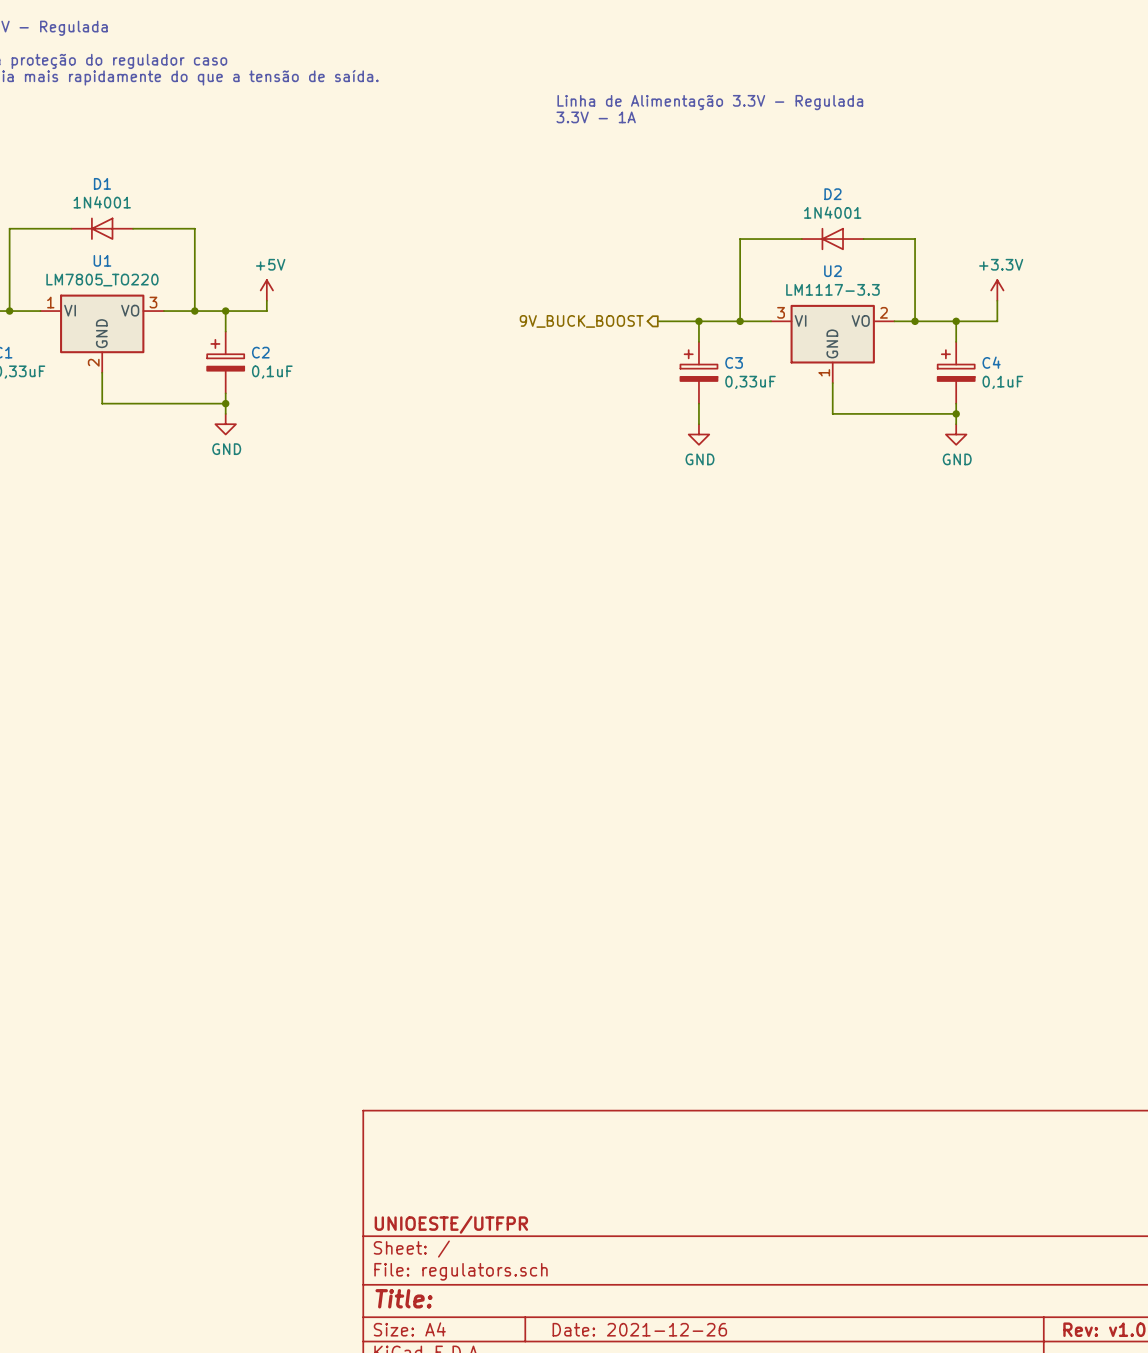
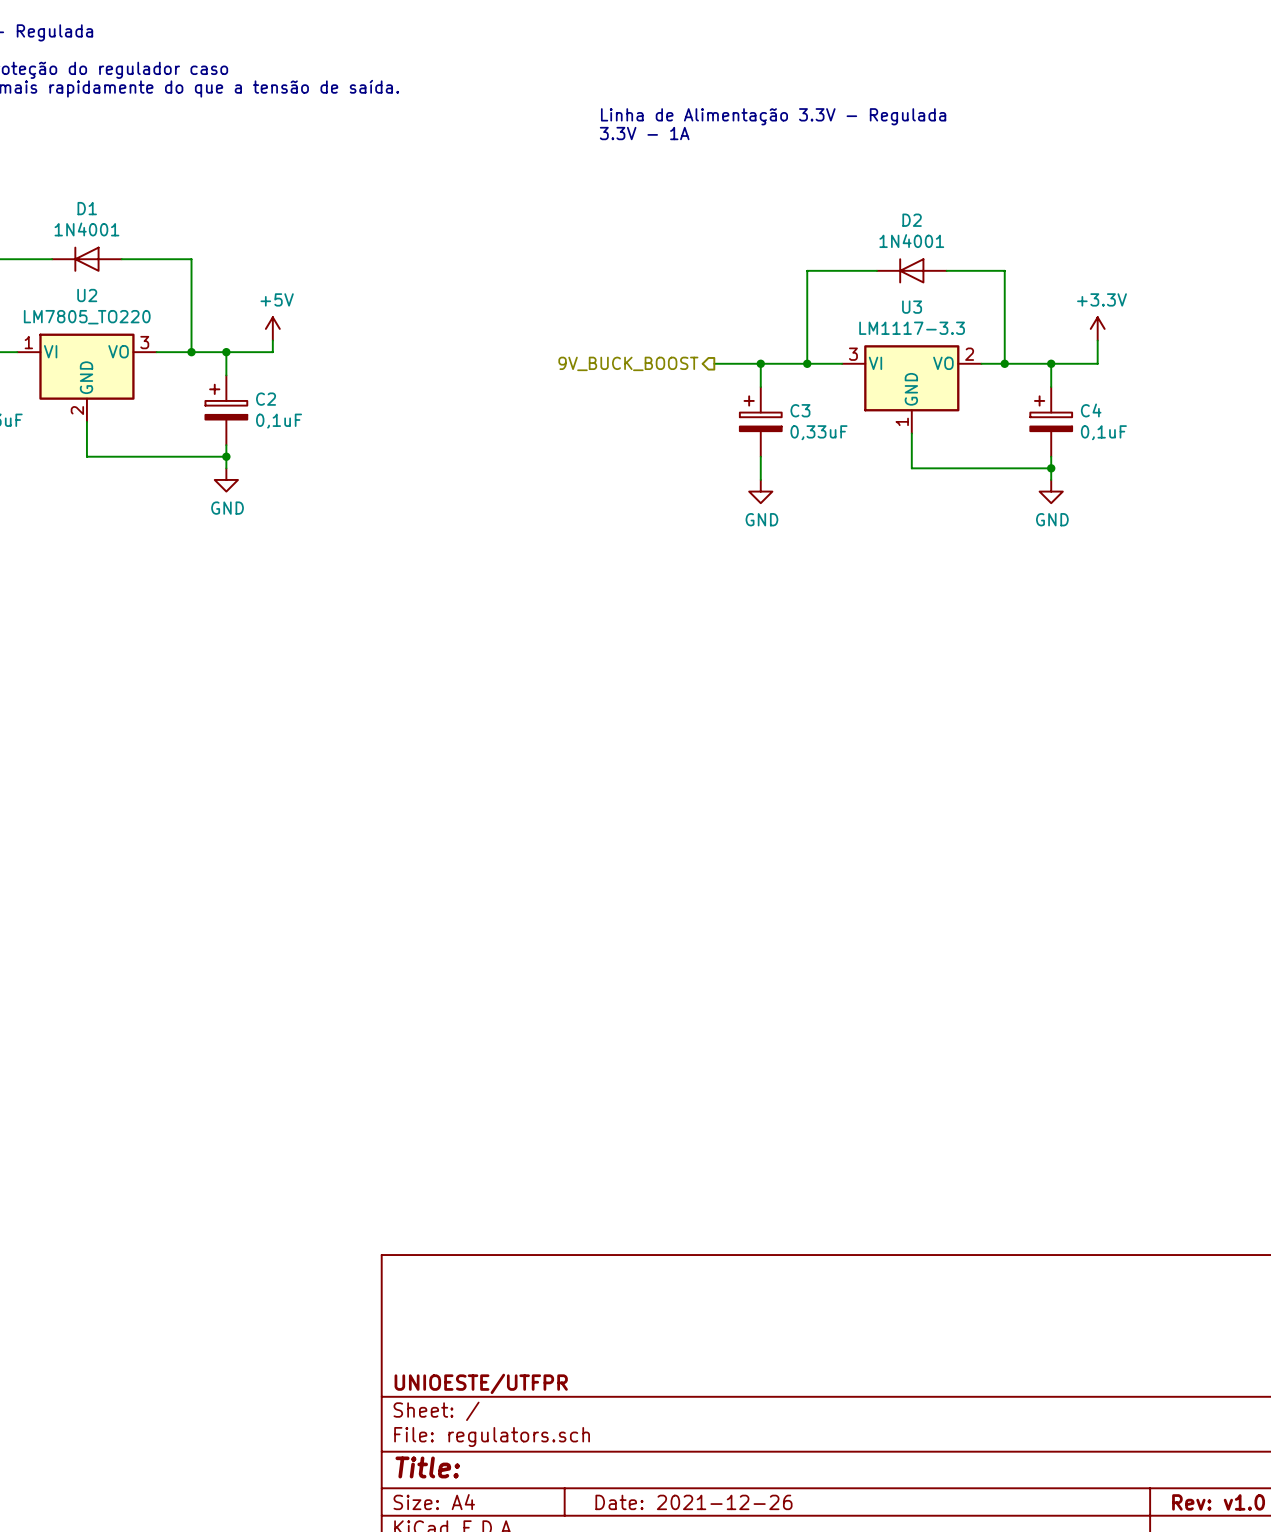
U1 name: U1 (102, 260) -> U2 (87, 295)
U2 name: U2 (832, 271) -> U3 (912, 307)

